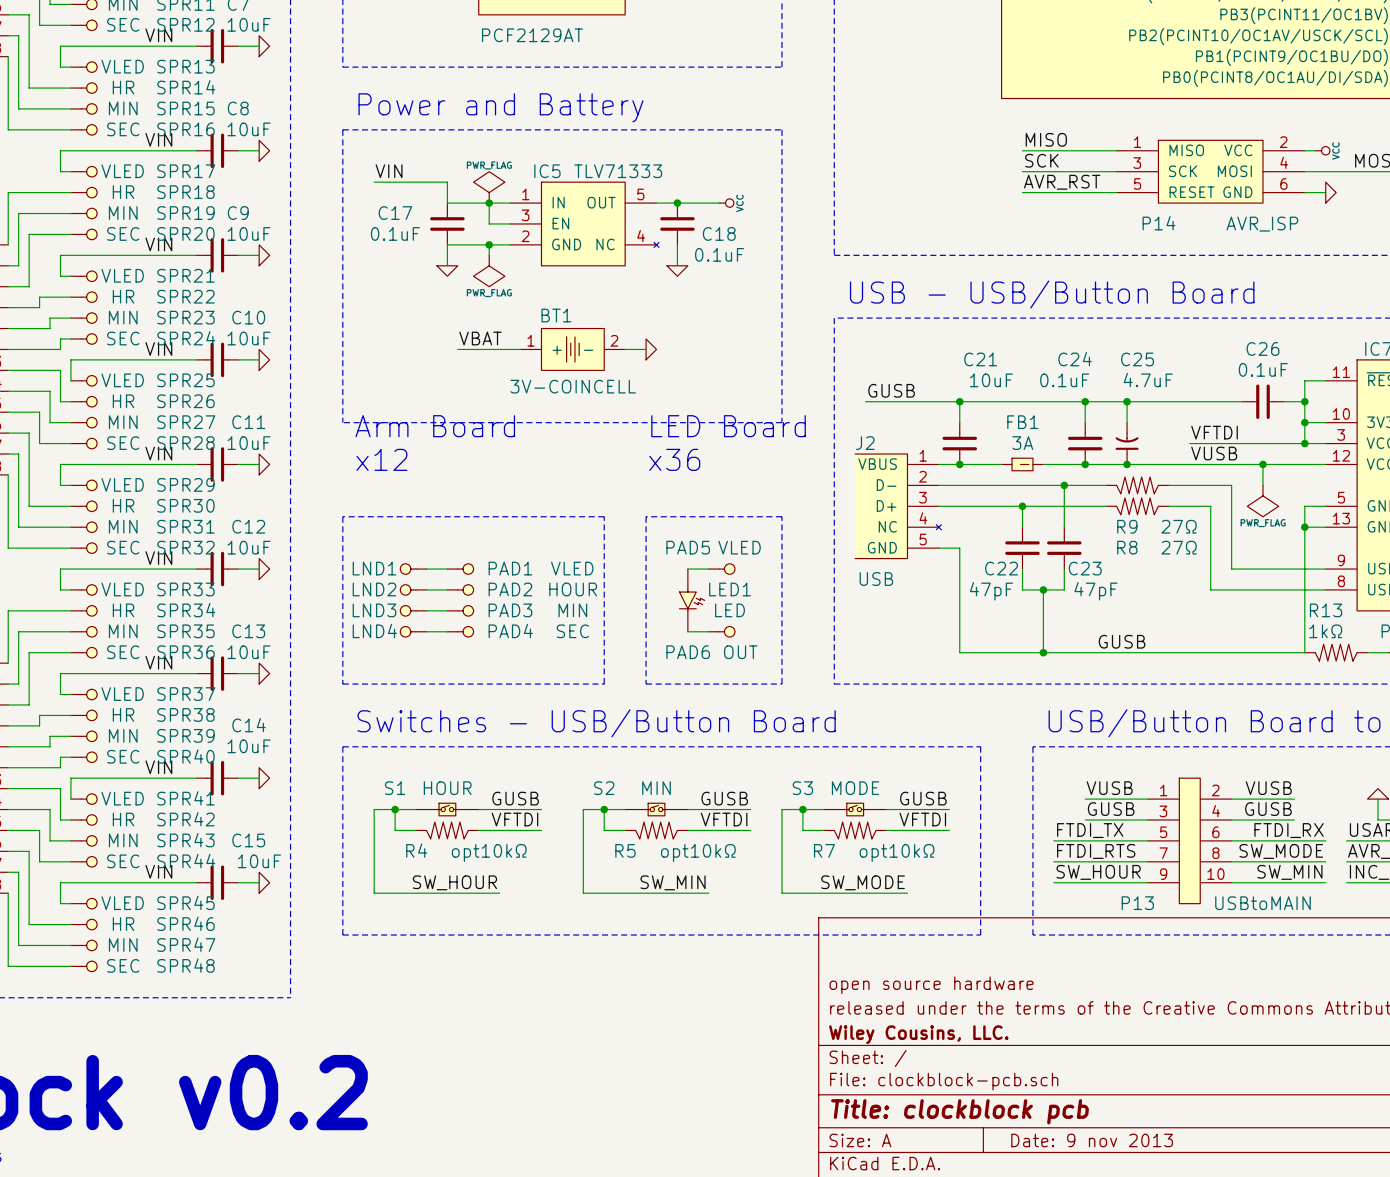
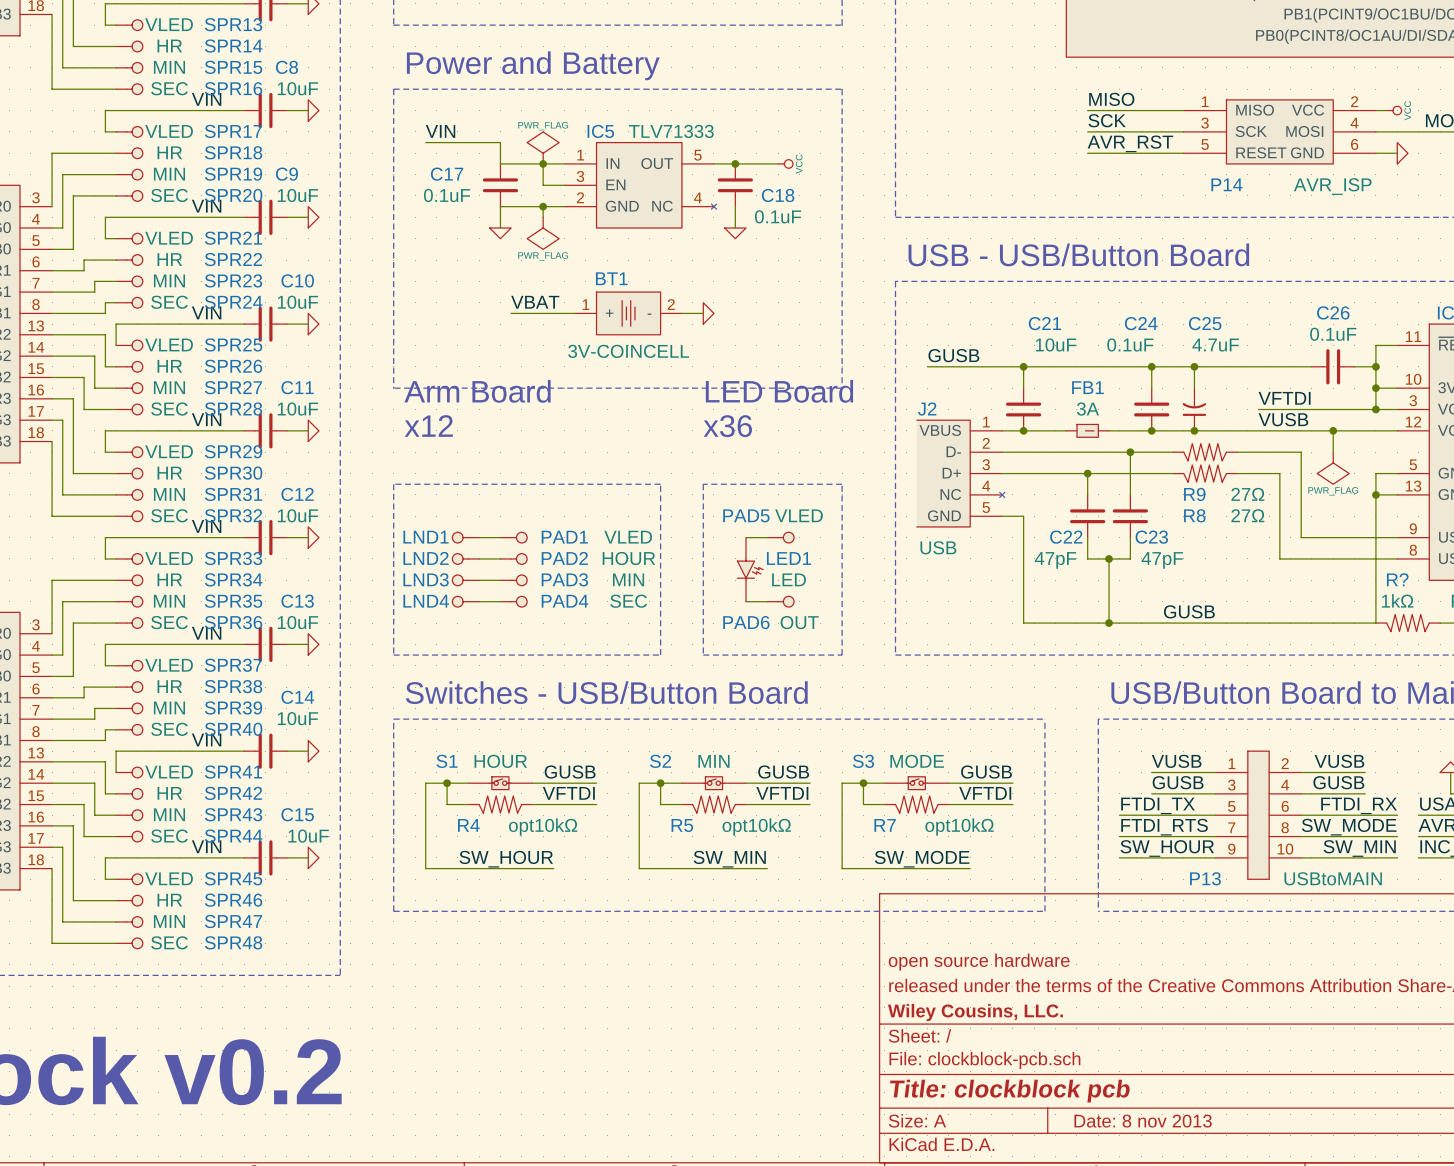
R13 name: R13 (1326, 610) -> R? (1397, 579)
title block: Date: 9 nov 2013 (1092, 1140) -> Date: 8 nov 2013 (1143, 1121)

